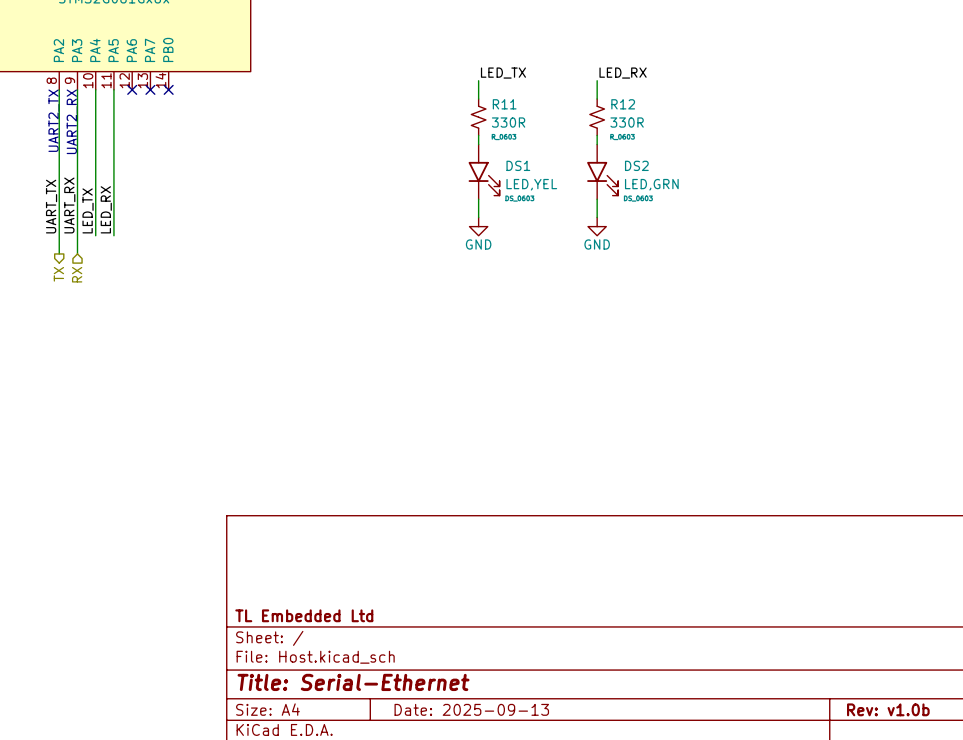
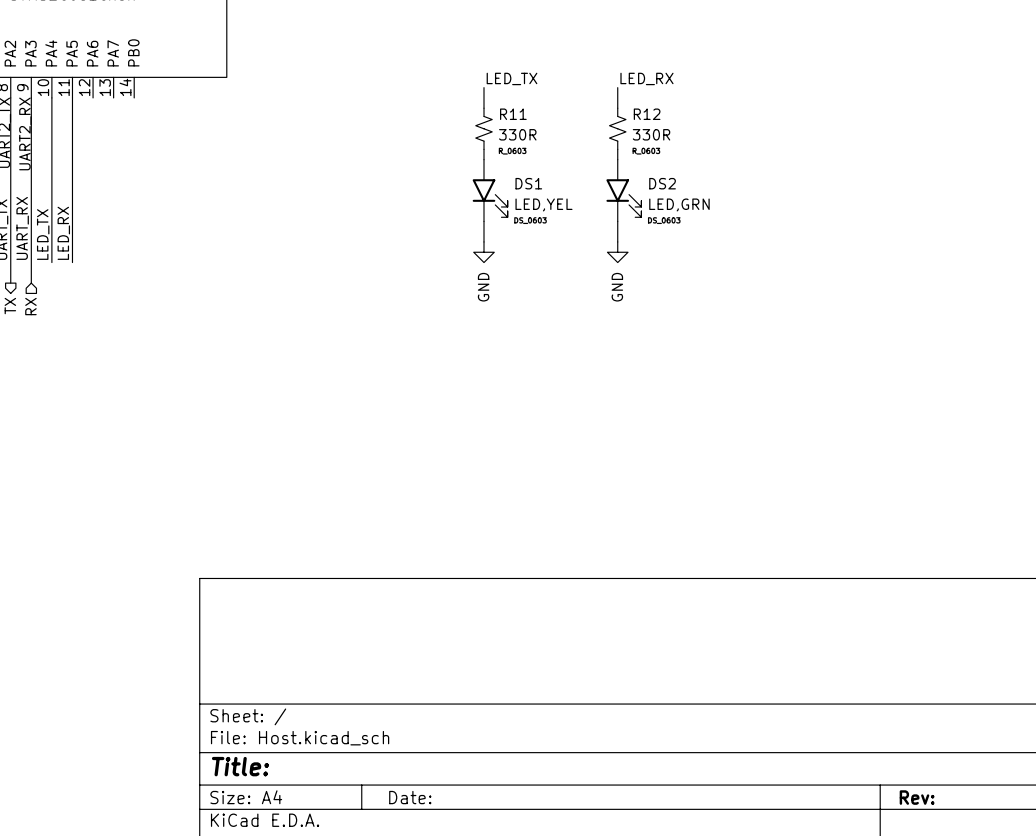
no-connect mark: (132, 89) -> none
no-connect mark: (150, 89) -> none
no-connect mark: (168, 89) -> none
power symbol text rotation: 0° (478, 244) -> 90° counterclockwise (483, 287)
power symbol text rotation: 0° (597, 244) -> 90° counterclockwise (617, 287)
title block: TL Embedded Ltd (304, 615) -> none
title block: Title: Serial-Ethernet (353, 682) -> Title: (240, 766)
title block: Date: 2025-09-13 (471, 709) -> Date: (410, 797)
title block: Rev: v1.0b (888, 709) -> Rev: (917, 797)

